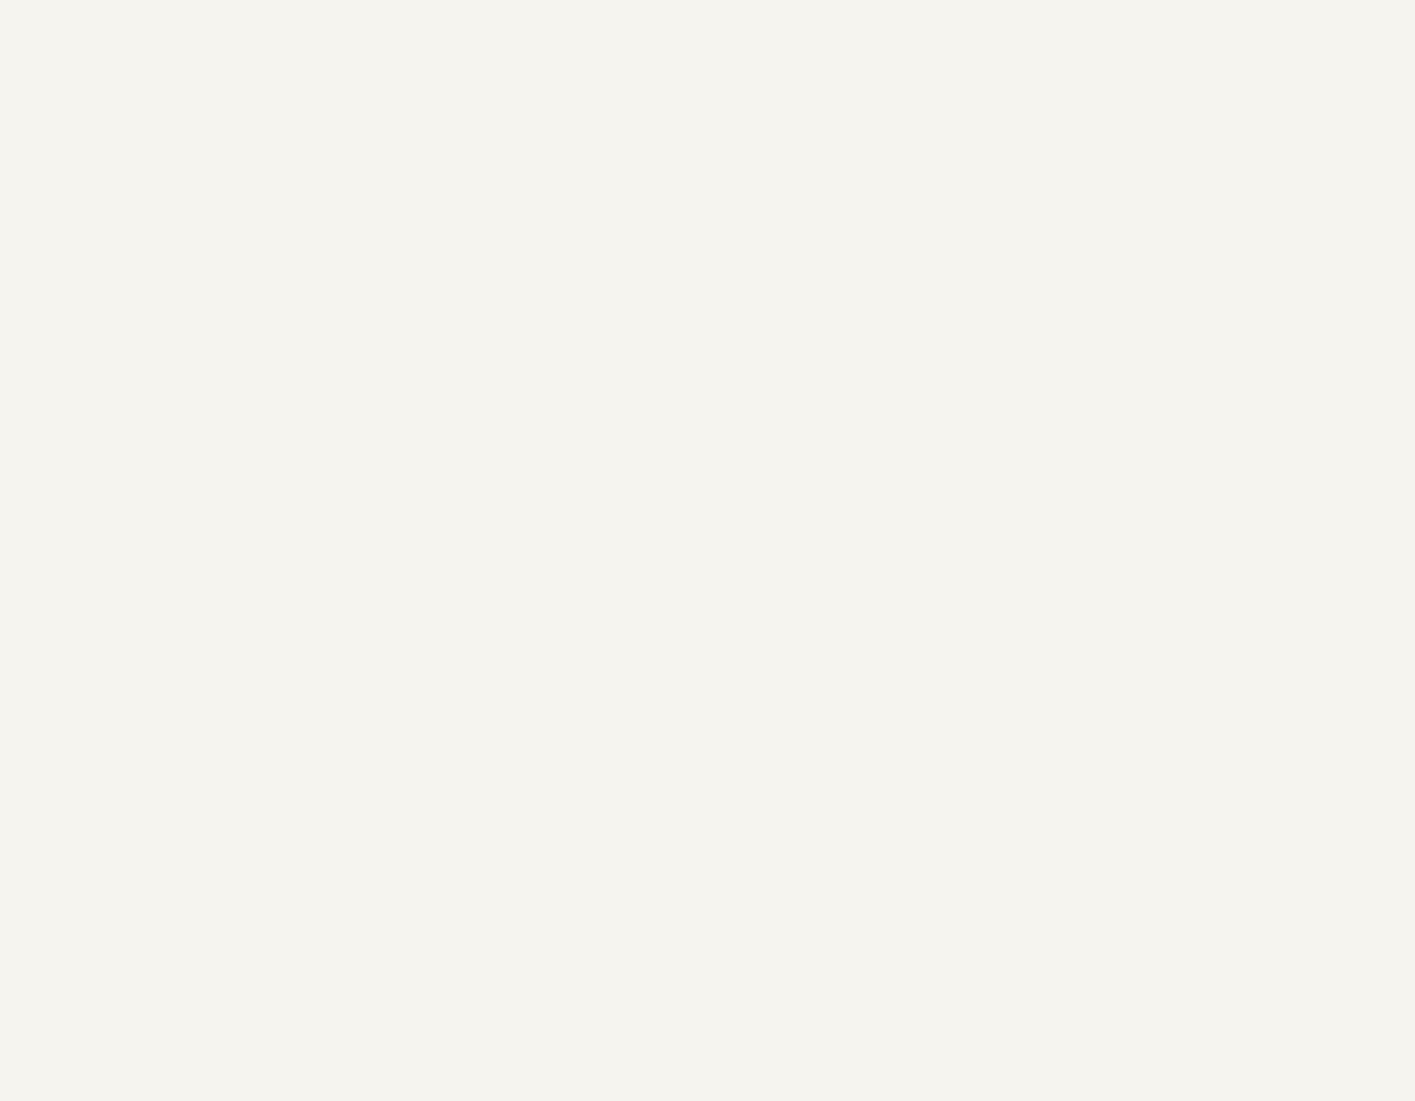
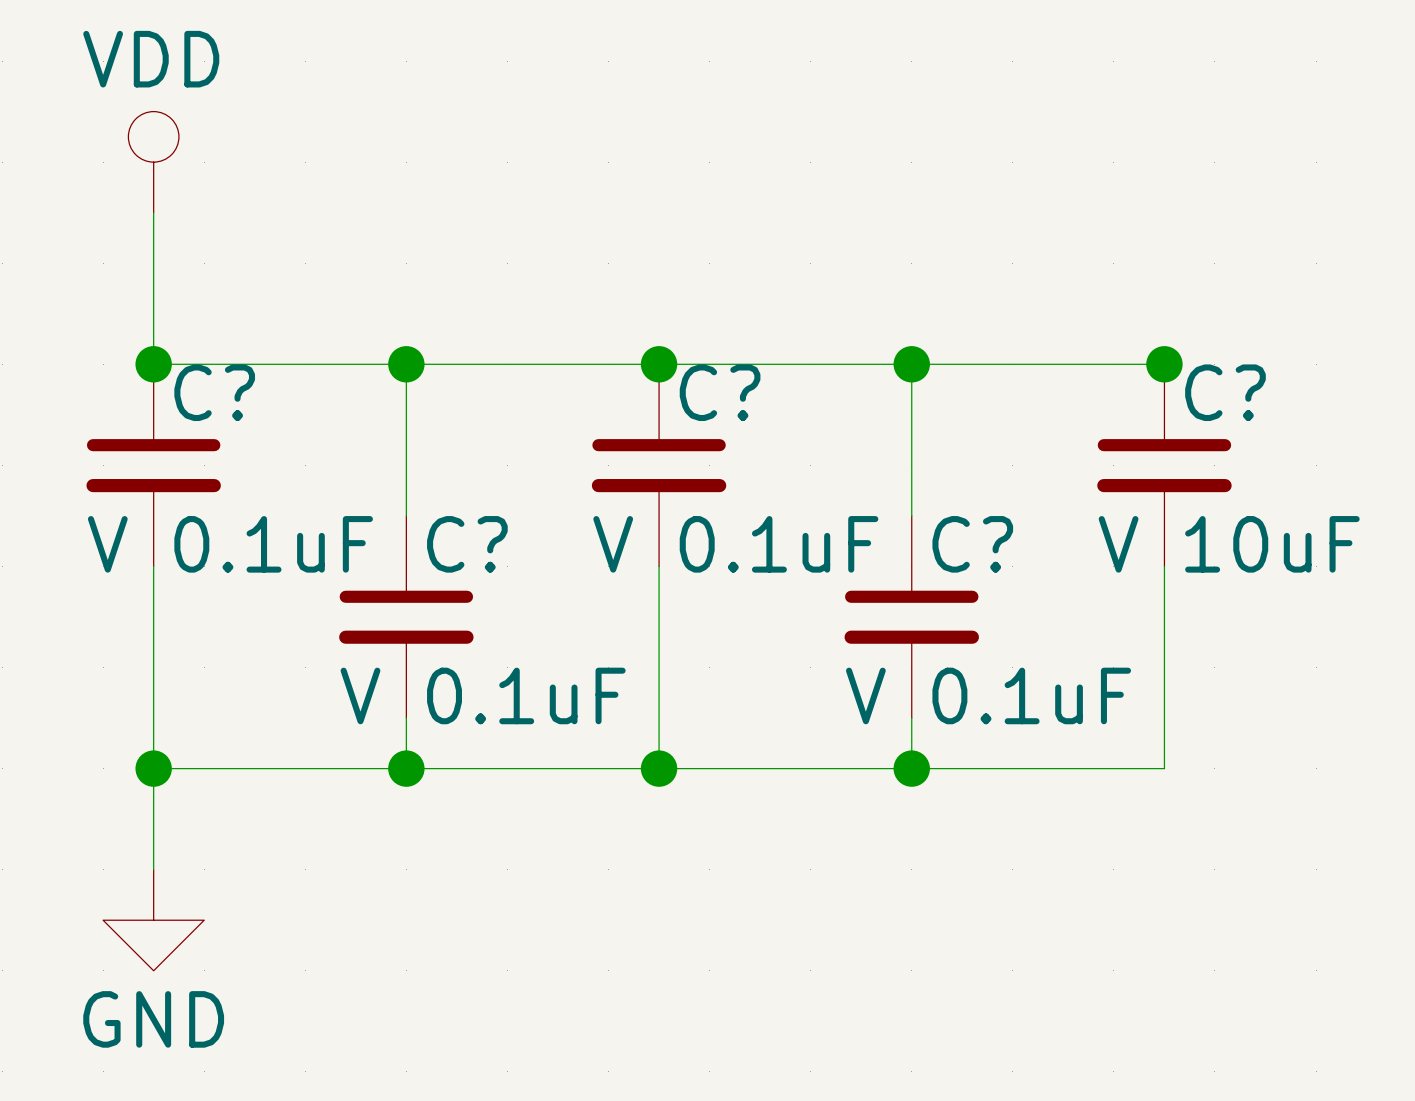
power symbol: none -> VDD (153, 162)
wire: none -> (153, 212) (153, 364) (1164, 364)
junction: none -> (153, 364)
wire: none -> (406, 364) (406, 515)
junction: none -> (406, 364)
junction: none -> (659, 364)
wire: none -> (911, 364) (911, 515)
junction: none -> (911, 364)
junction: none -> (1164, 364)
C?: none -> 0.1uF (153, 465)
C?: none -> 0.1uF (659, 465)
C?: none -> 10uF (1164, 465)
wire: none -> (153, 566) (153, 869)
wire: none -> (659, 566) (659, 768)
wire: none -> (1164, 566) (1164, 768) (153, 768)
C?: none -> 0.1uF (406, 616)
C?: none -> 0.1uF (911, 616)
wire: none -> (406, 718) (406, 768)
wire: none -> (911, 718) (911, 768)
junction: none -> (153, 768)
junction: none -> (406, 768)
junction: none -> (659, 768)
junction: none -> (911, 768)
power symbol: none -> GND (153, 920)

